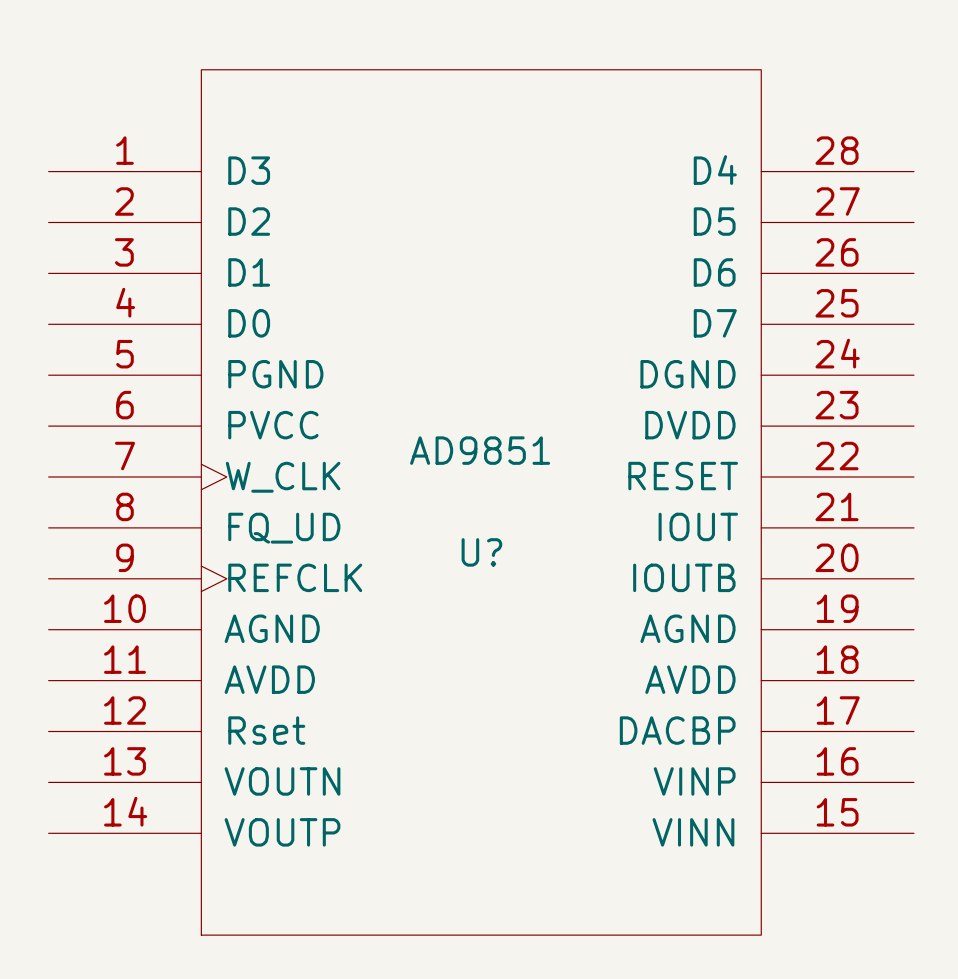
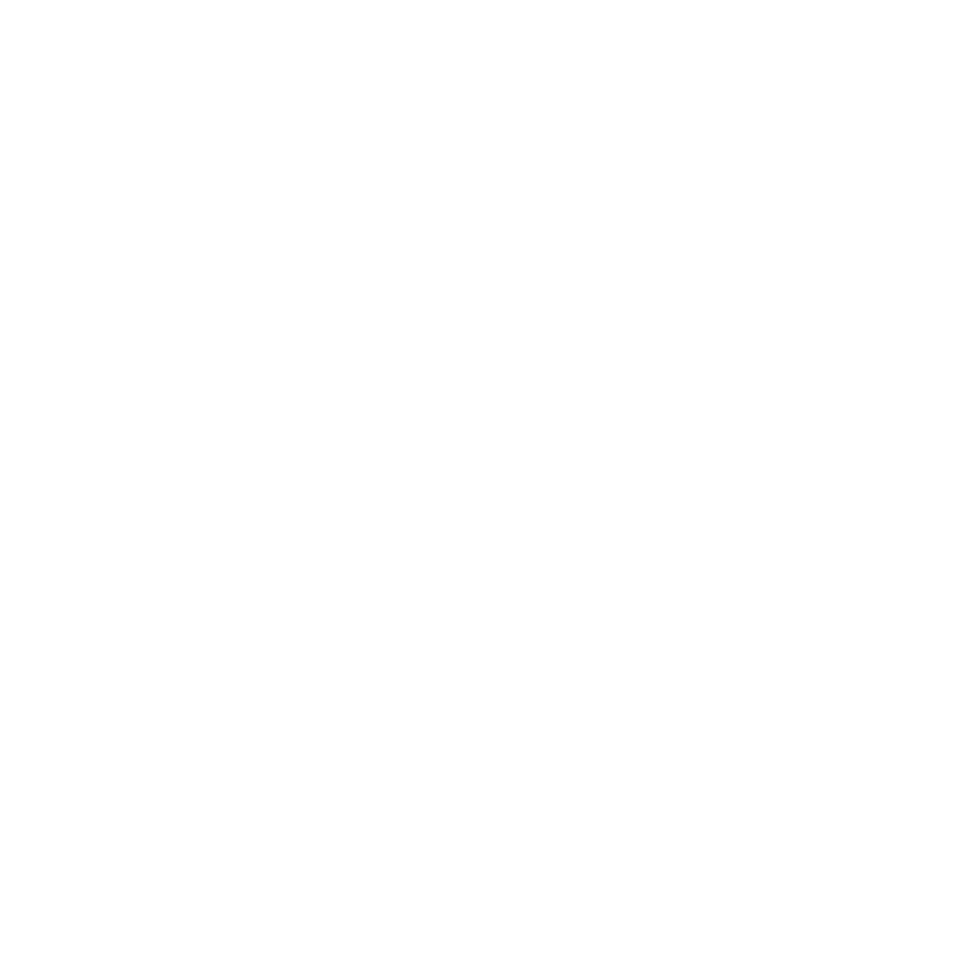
U?: AD9851 (481, 502) -> none

